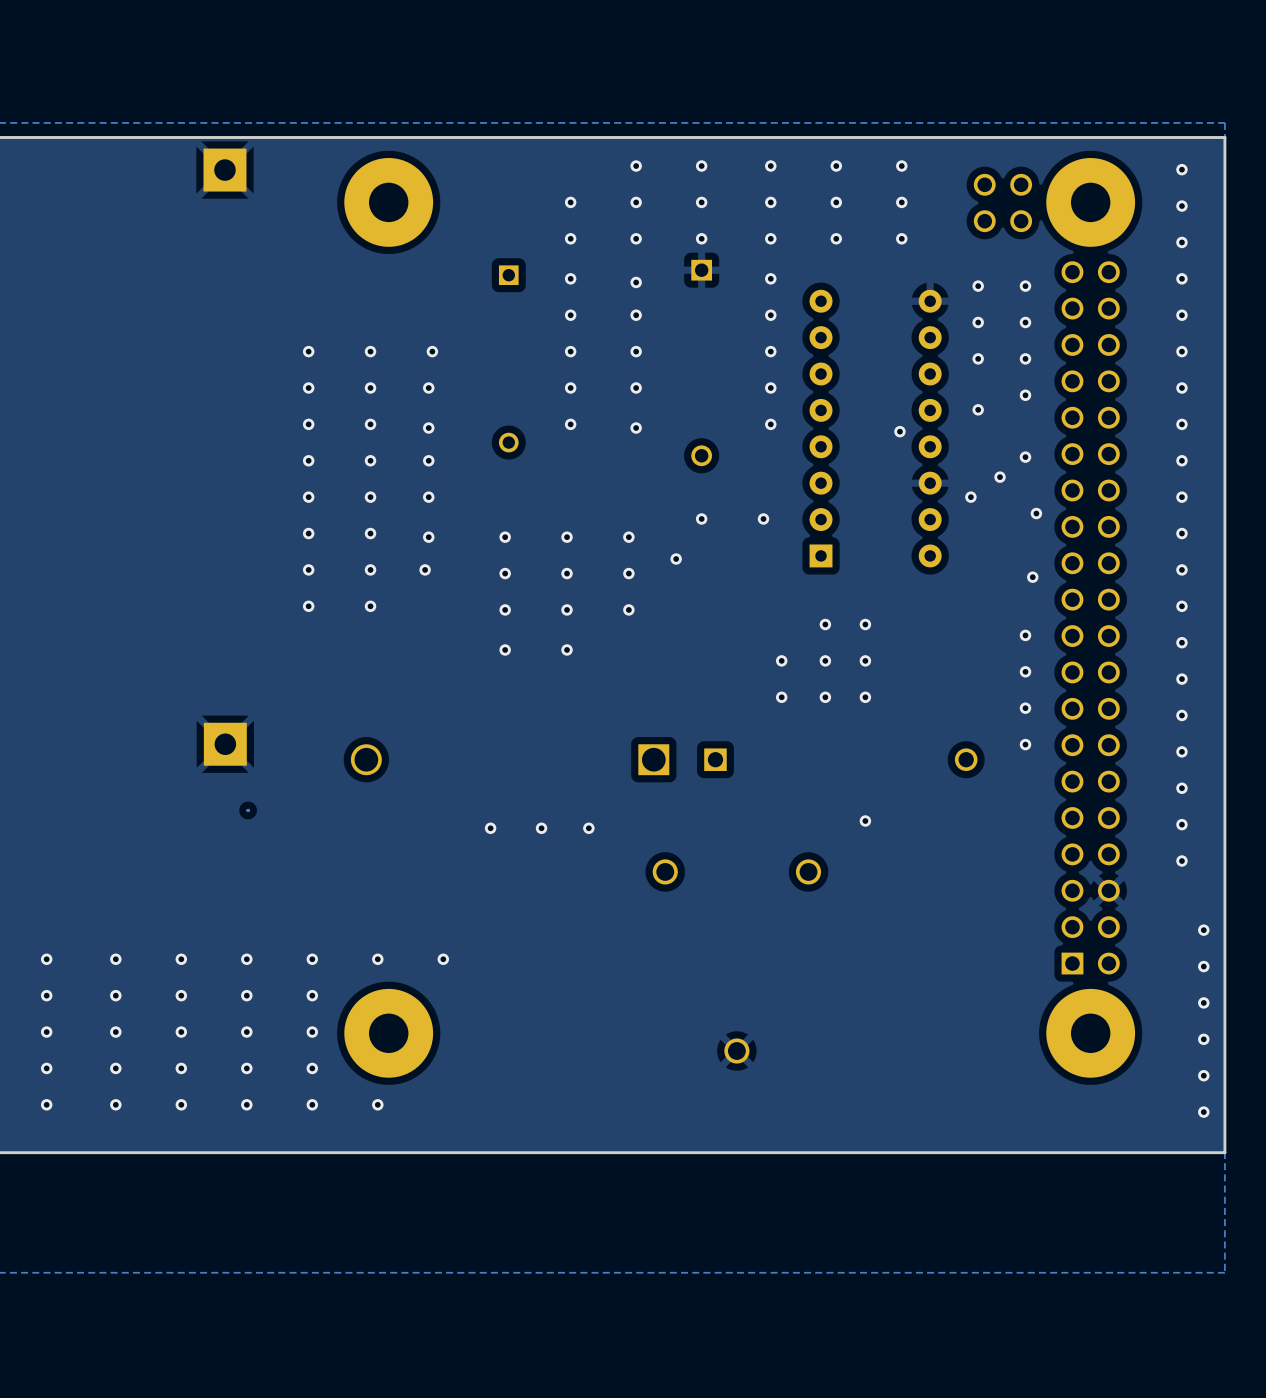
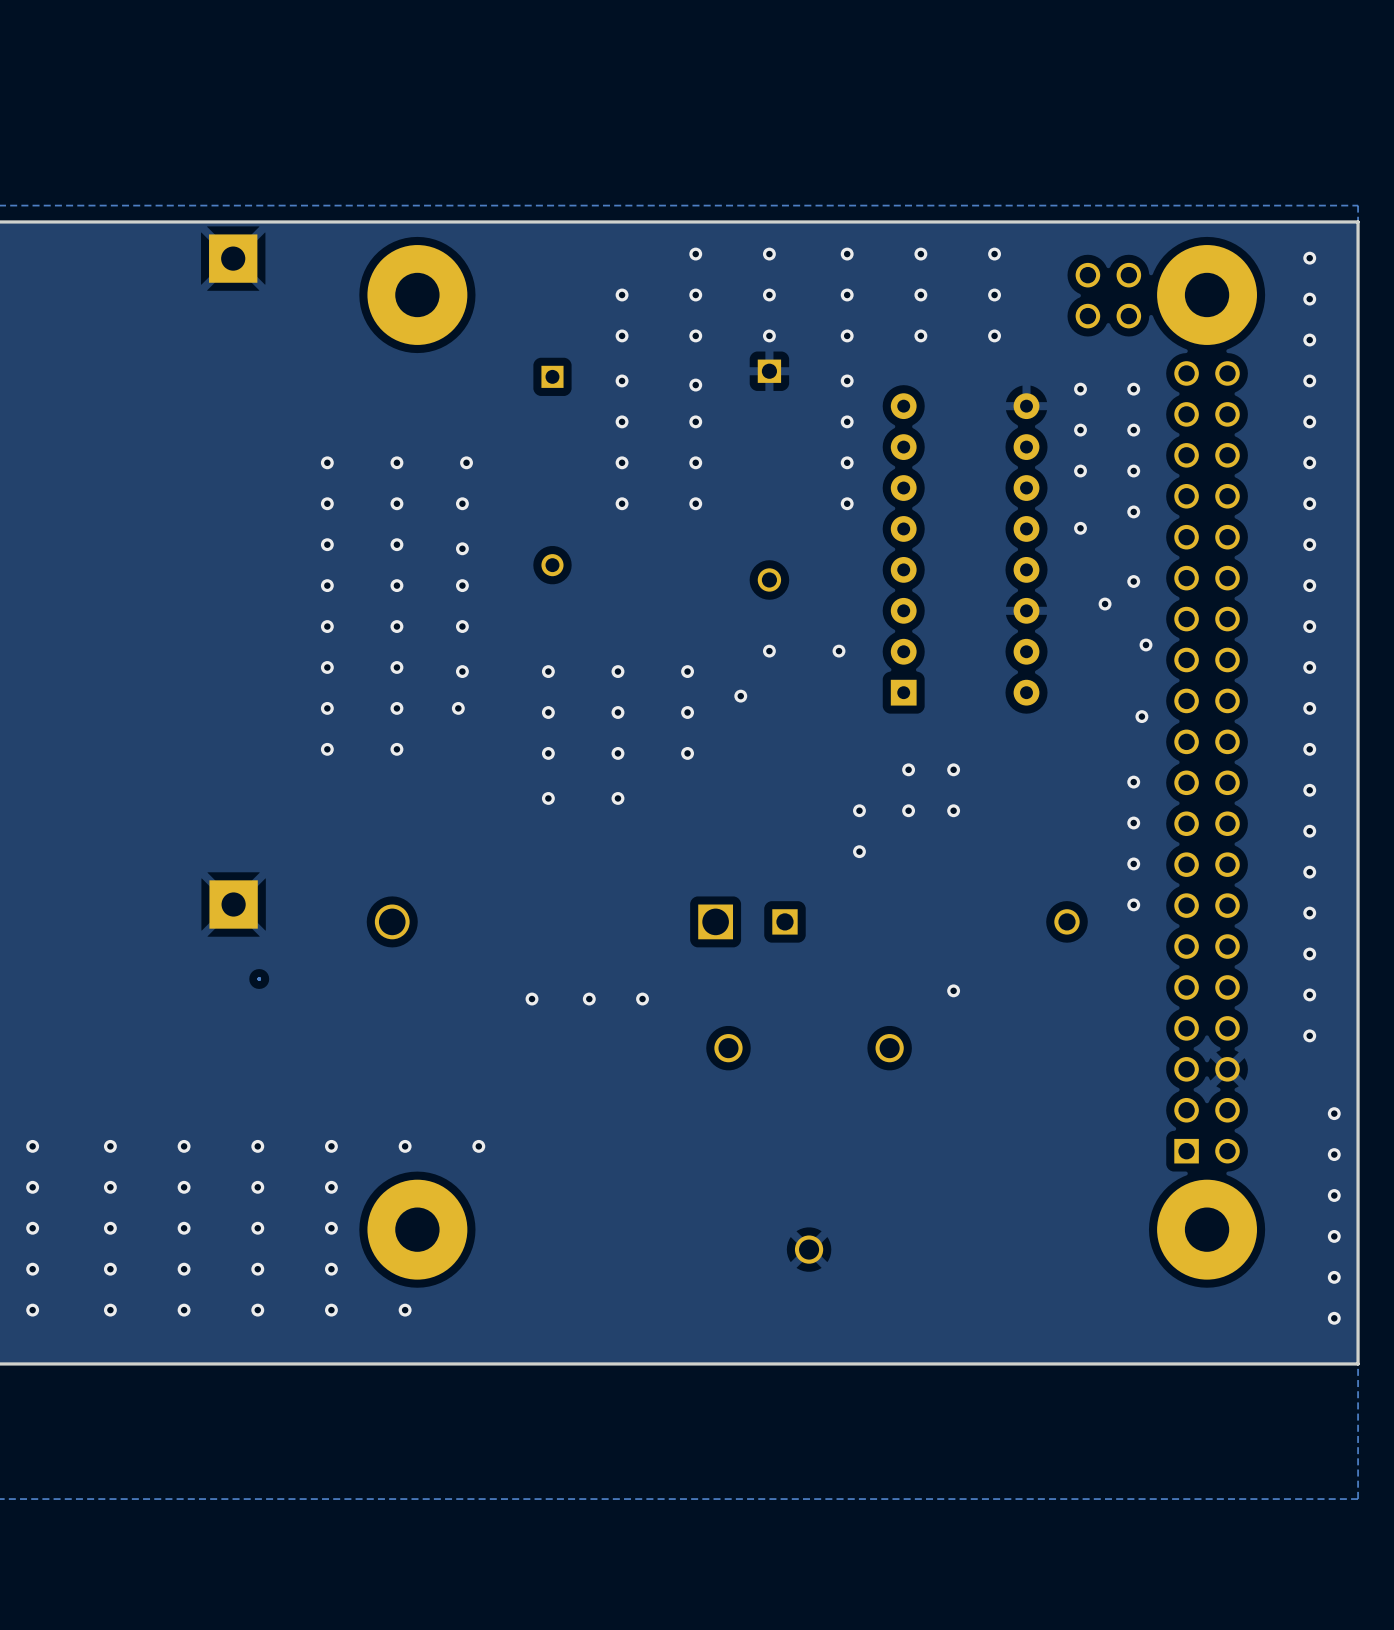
via: (570, 424) -> none
via: (770, 424) -> none
via: (636, 428) -> none
via: (899, 431) -> none
via: (970, 497) -> none
via: (825, 697) -> none
via: (865, 697) -> none

